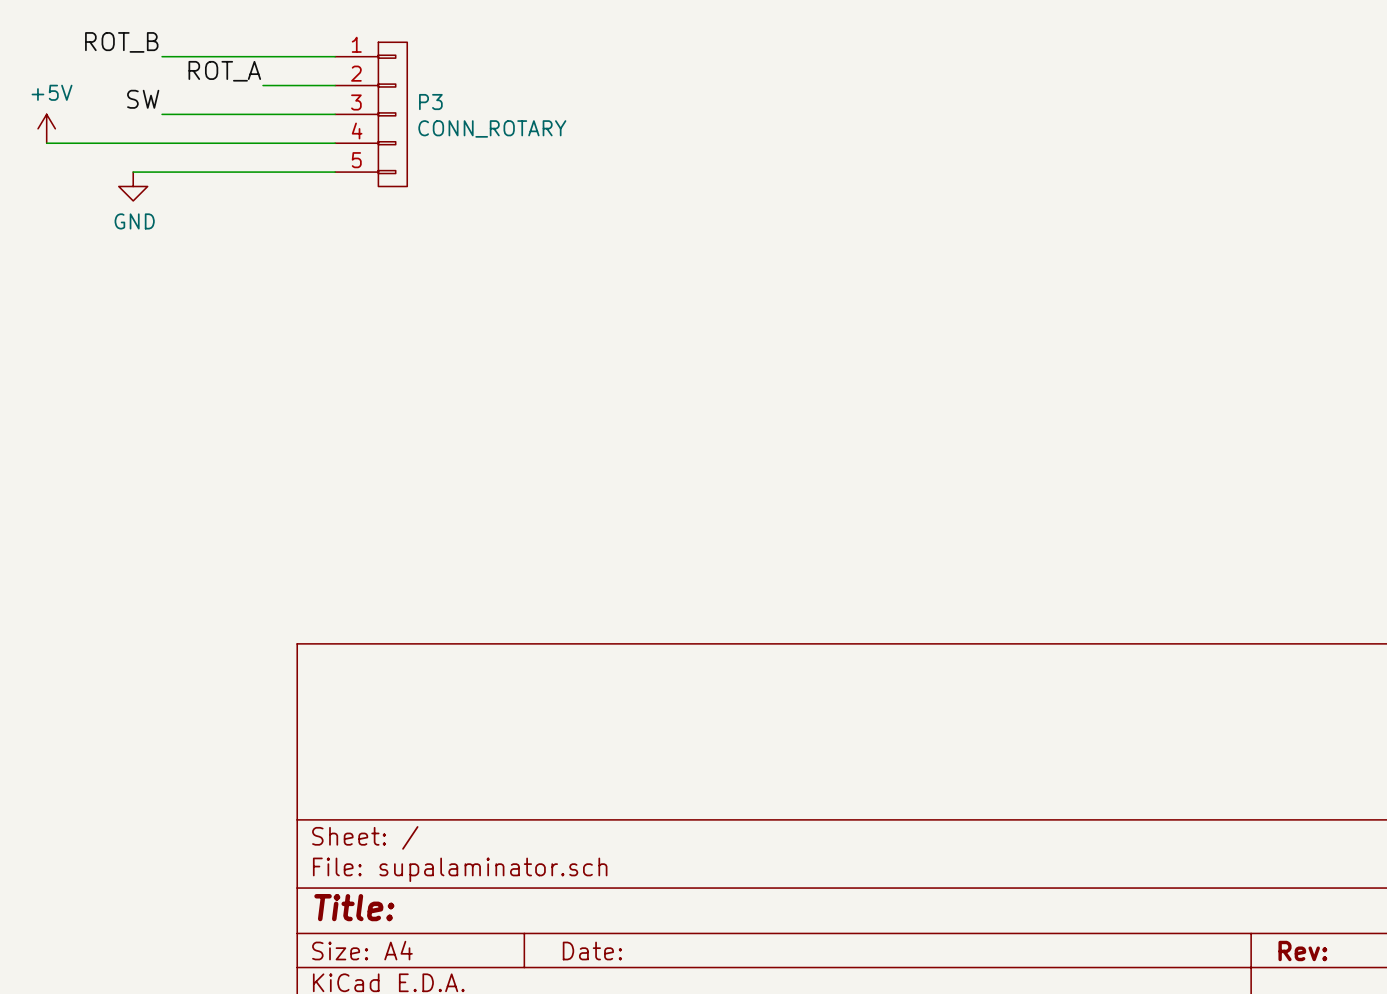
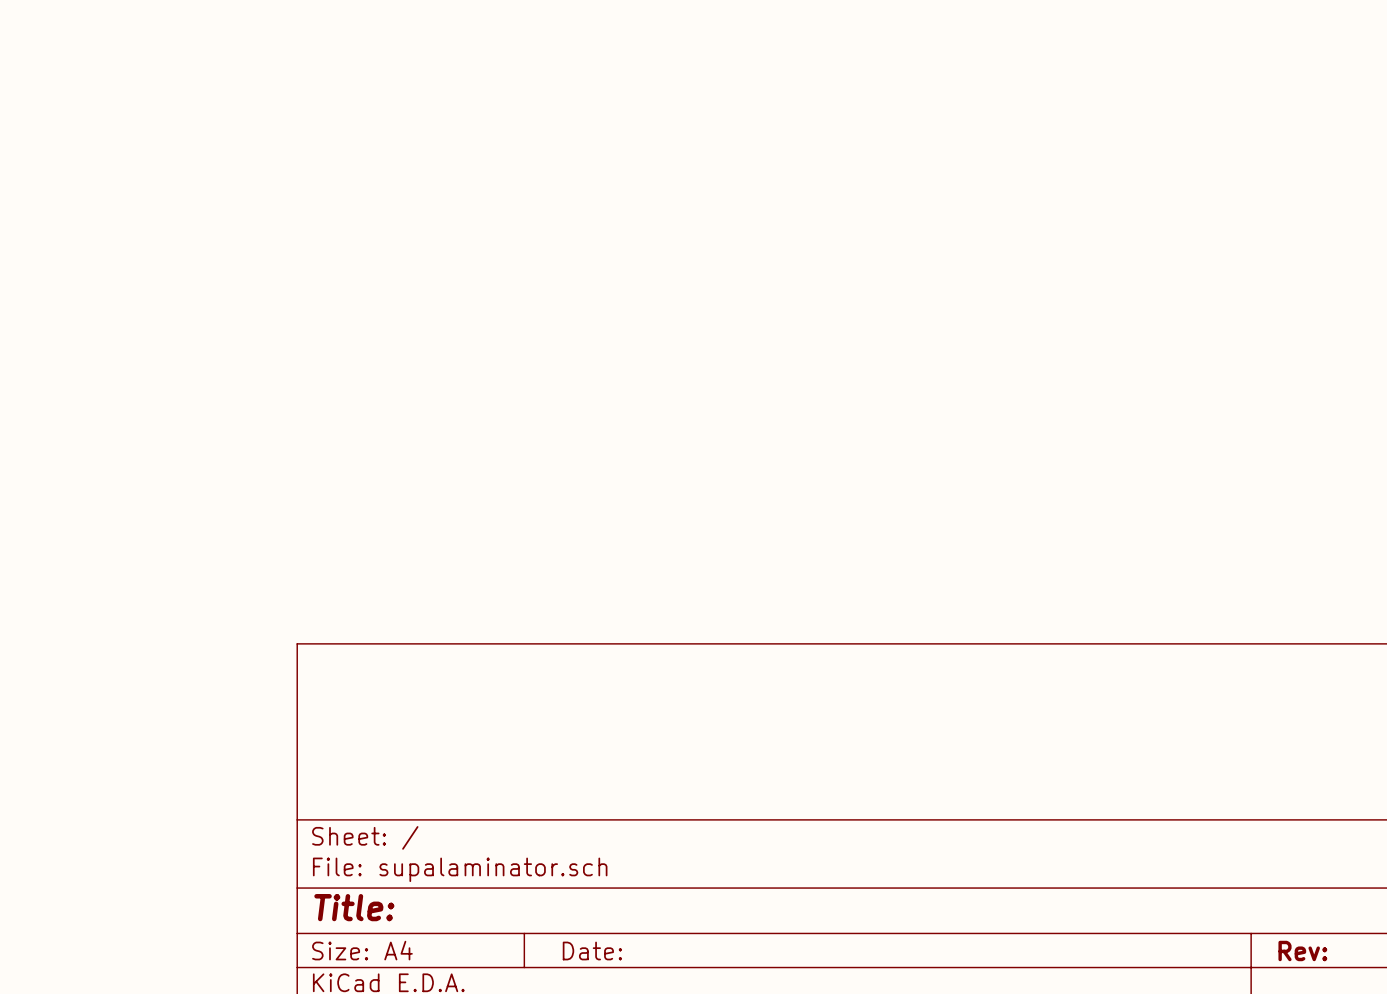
label: ROT_B (121, 42) -> none
wire: (162, 56) (335, 56) -> none
label: ROT_A (224, 71) -> none
wire: (263, 85) (335, 85) -> none
label: SW (143, 99) -> none
wire: (162, 114) (335, 114) -> none
P3: CONN_ROTARY (371, 114) -> none
power symbol: +5V (46, 128) -> none
wire: (46, 143) (335, 143) -> none
wire: (133, 172) (335, 172) -> none
power symbol: GND (133, 186) -> none

